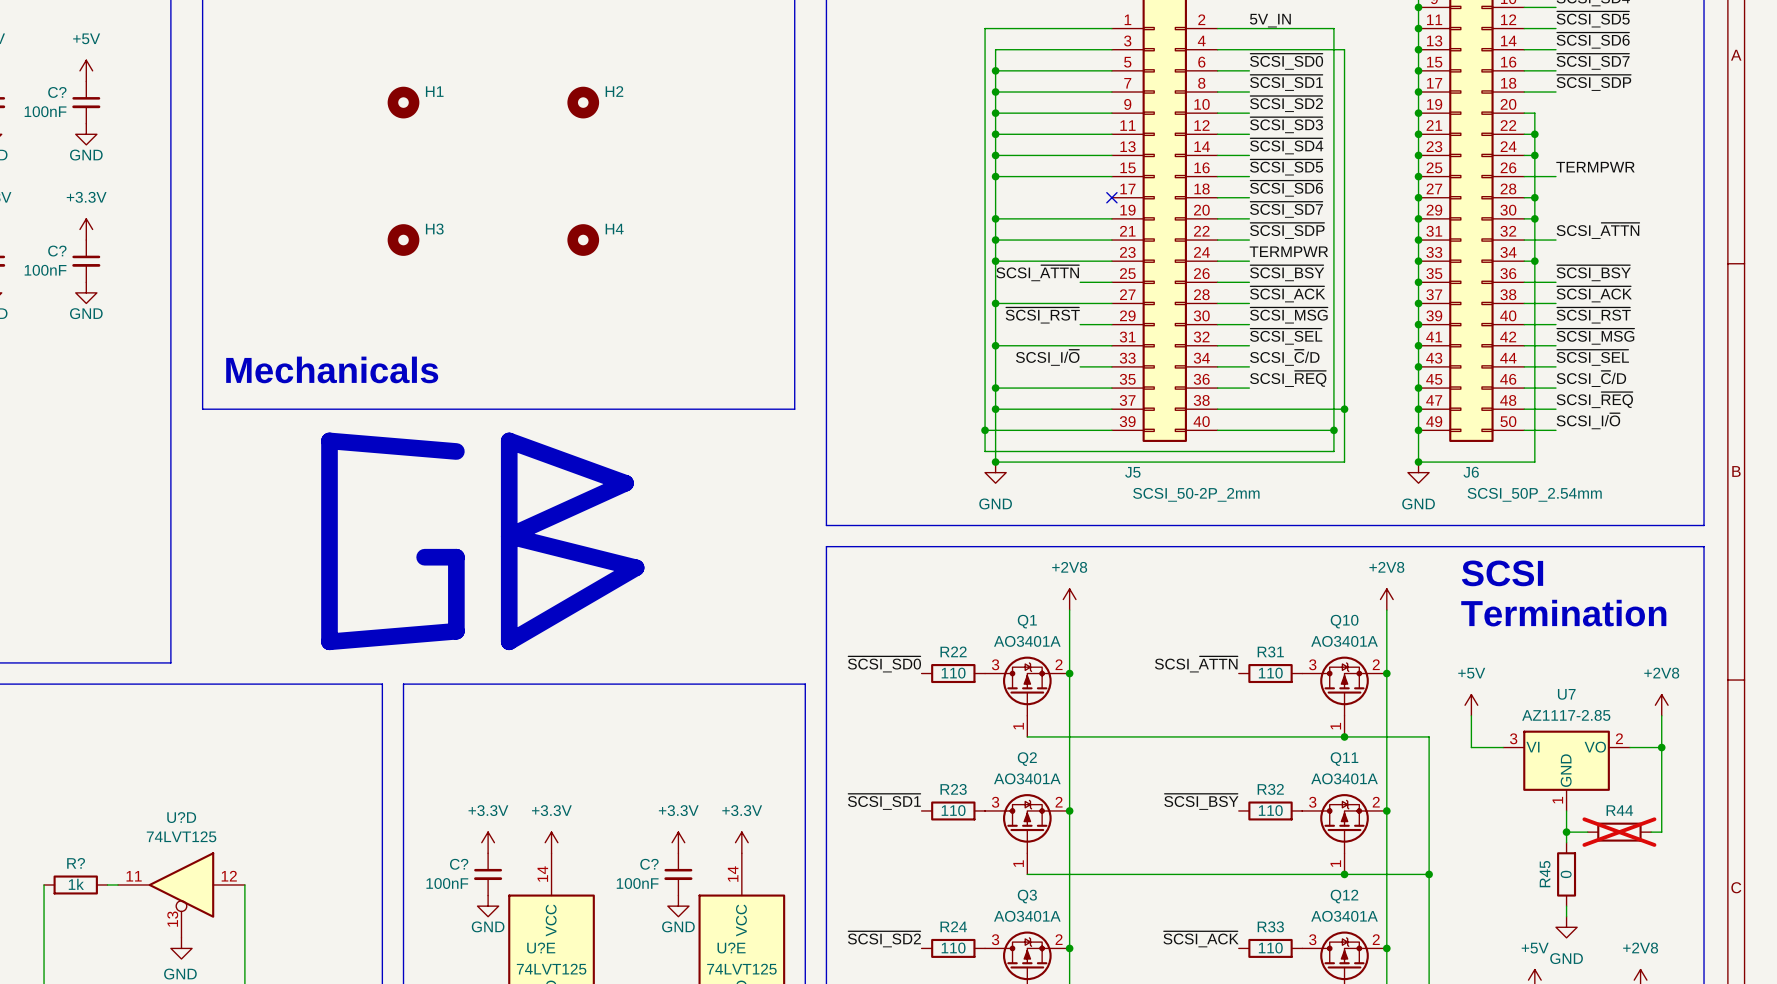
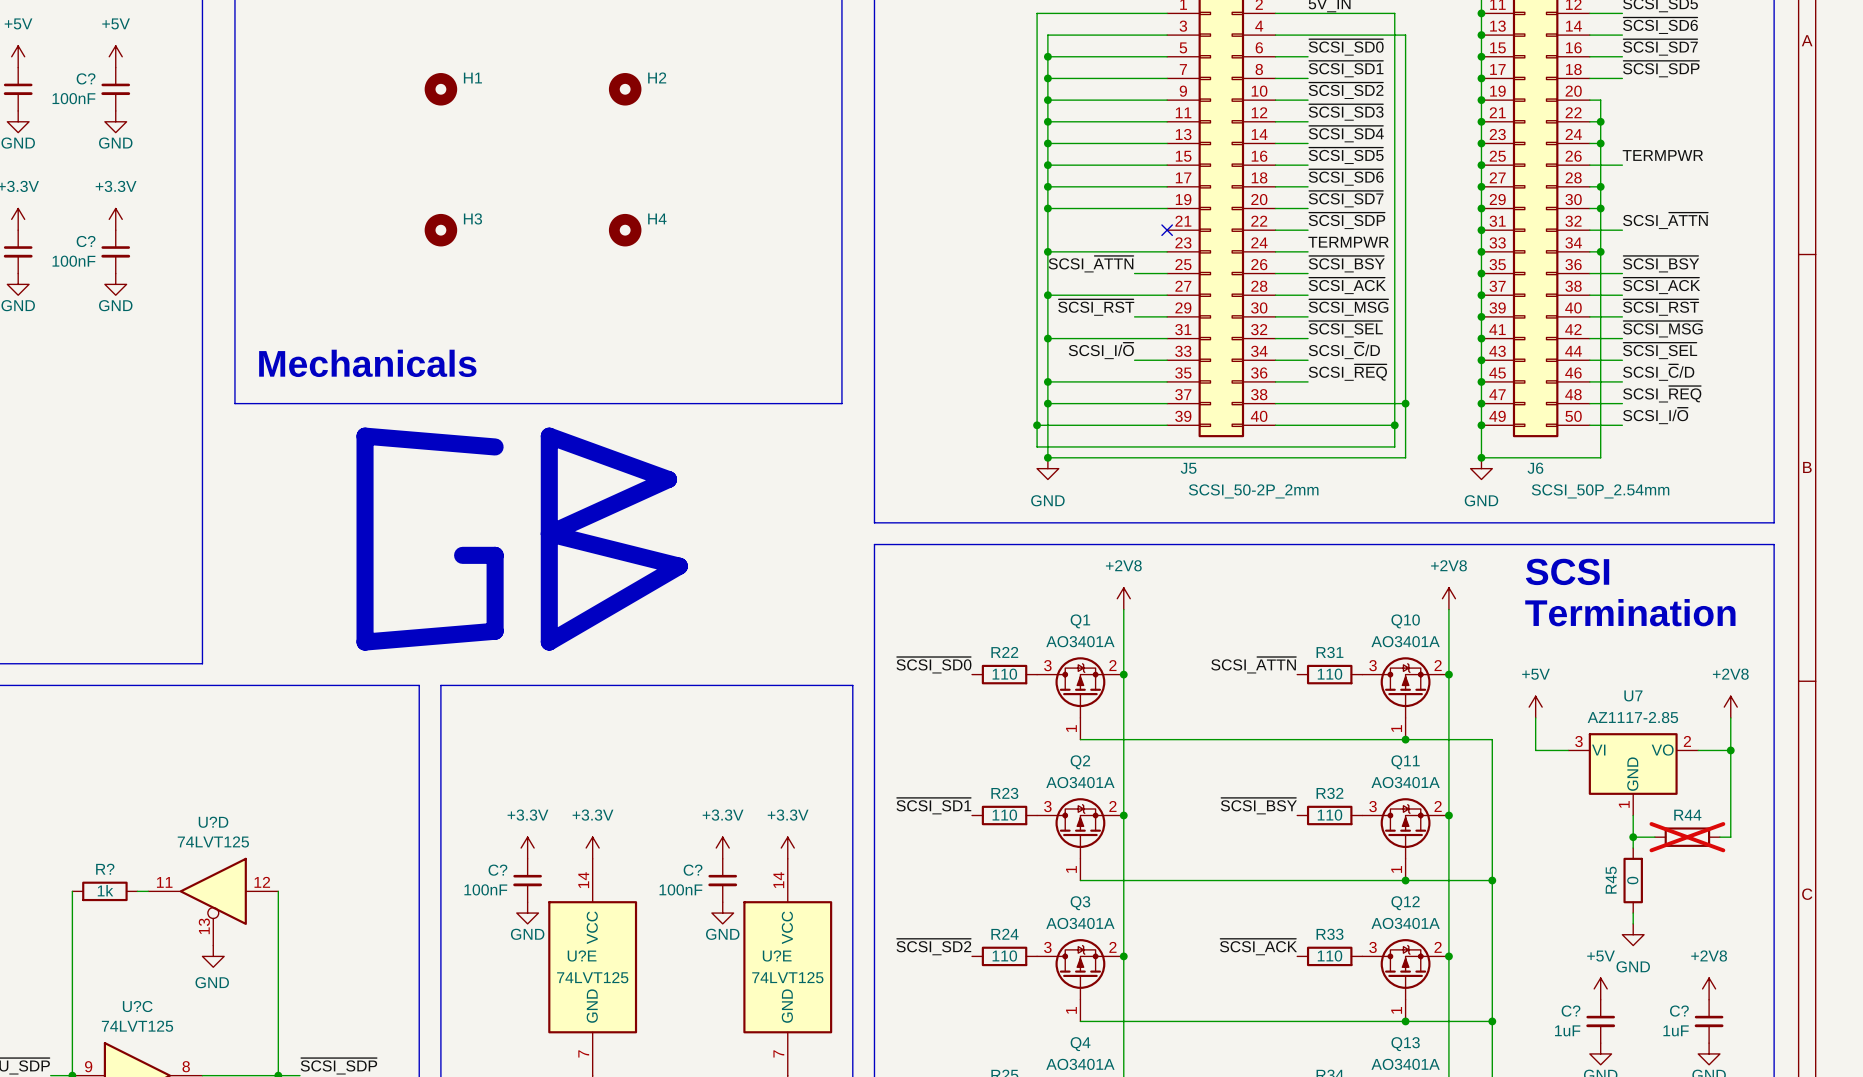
no-connect mark position: (1111, 197) -> (1167, 230)
wire: (995, 240) (1111, 240) -> (1047, 186) (1167, 186)
junction position: (995, 240) -> (1047, 186)

